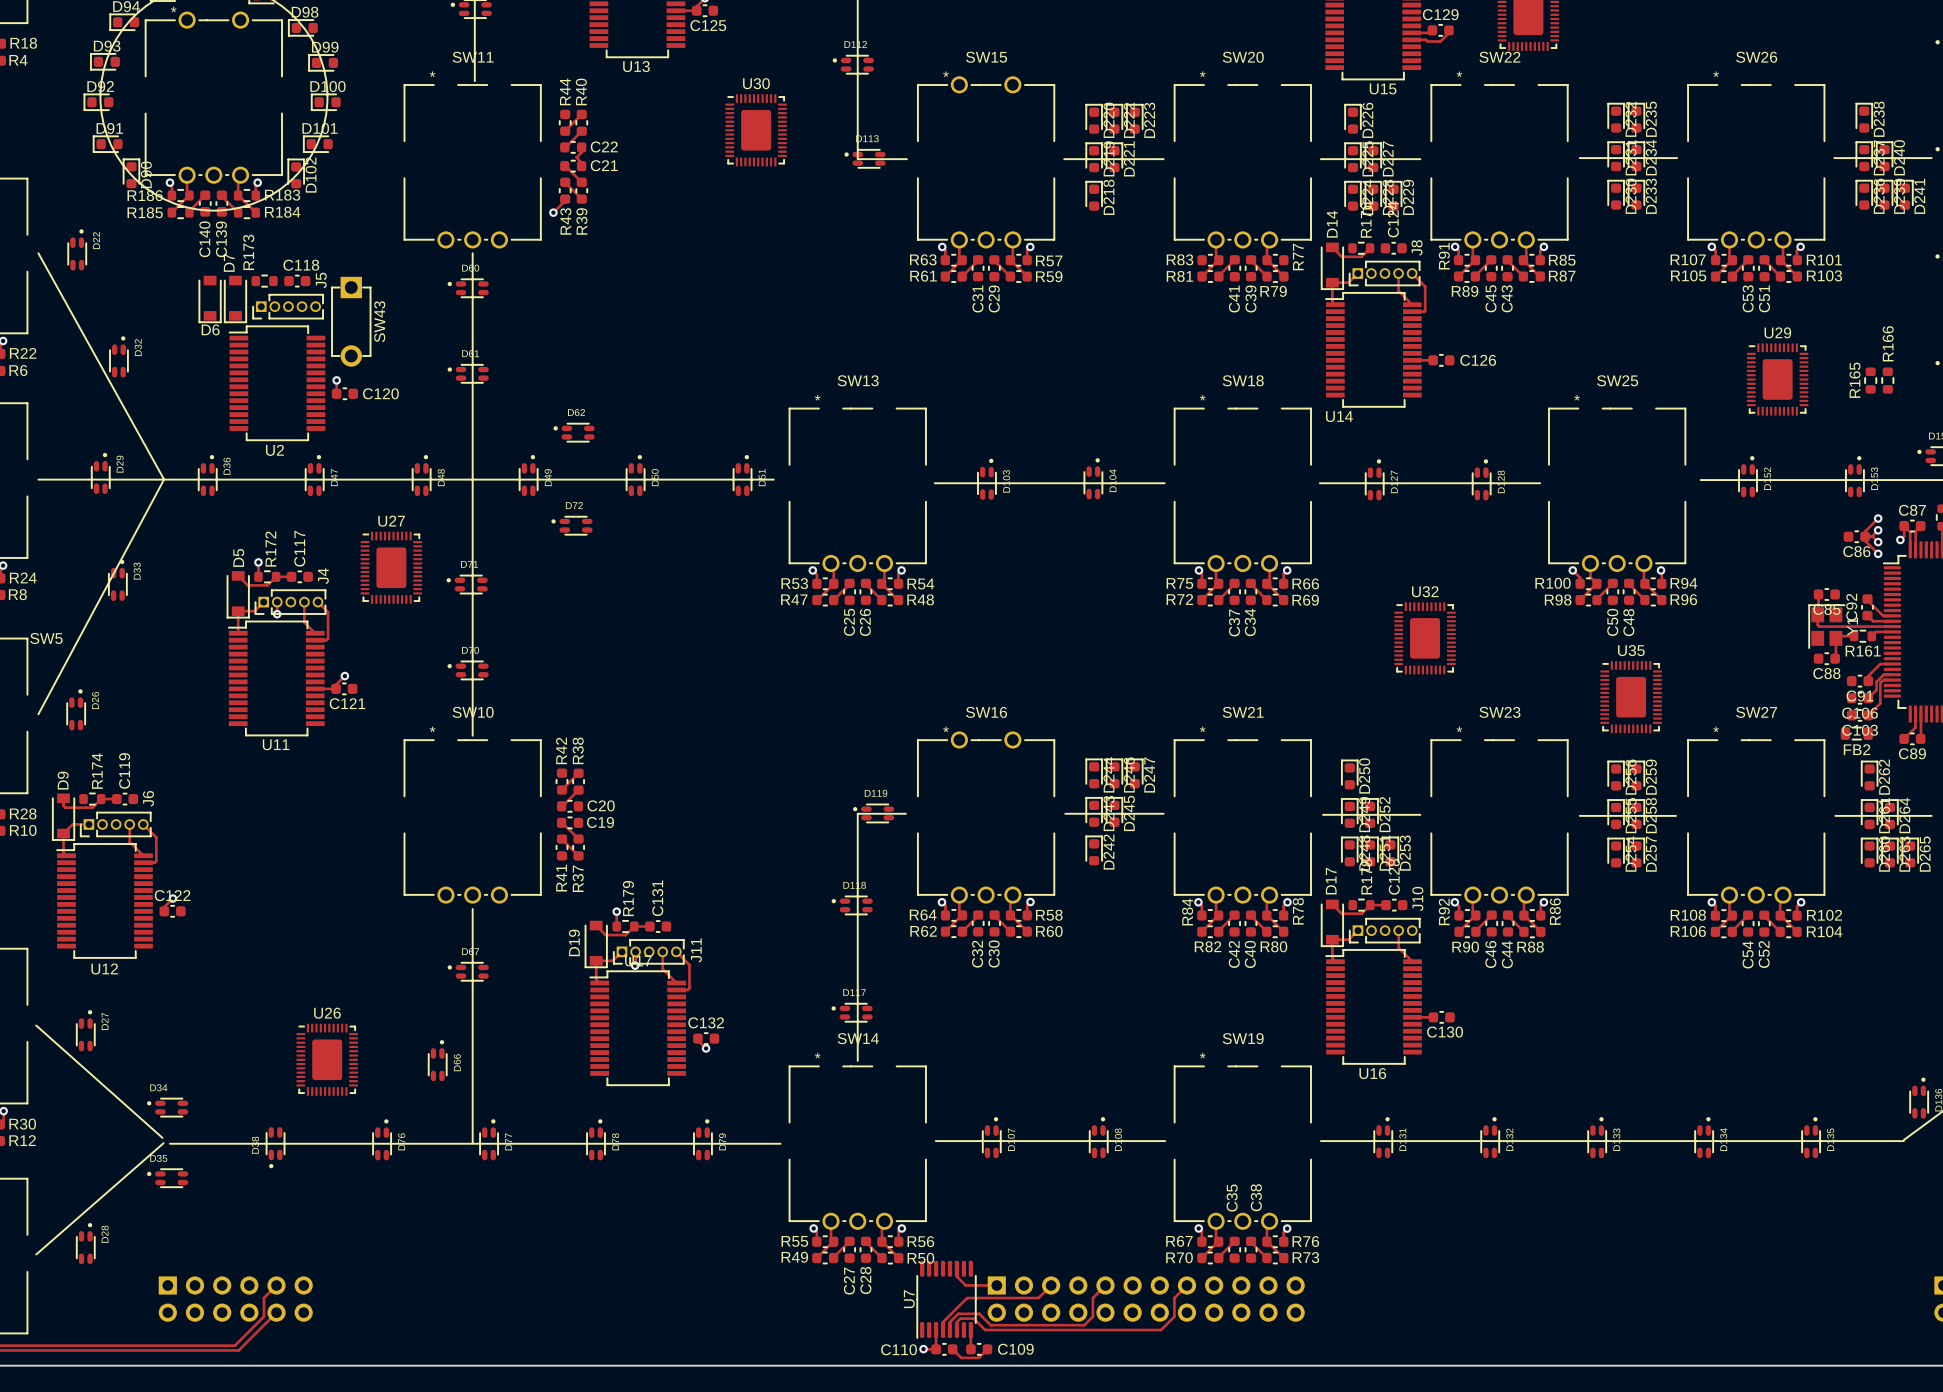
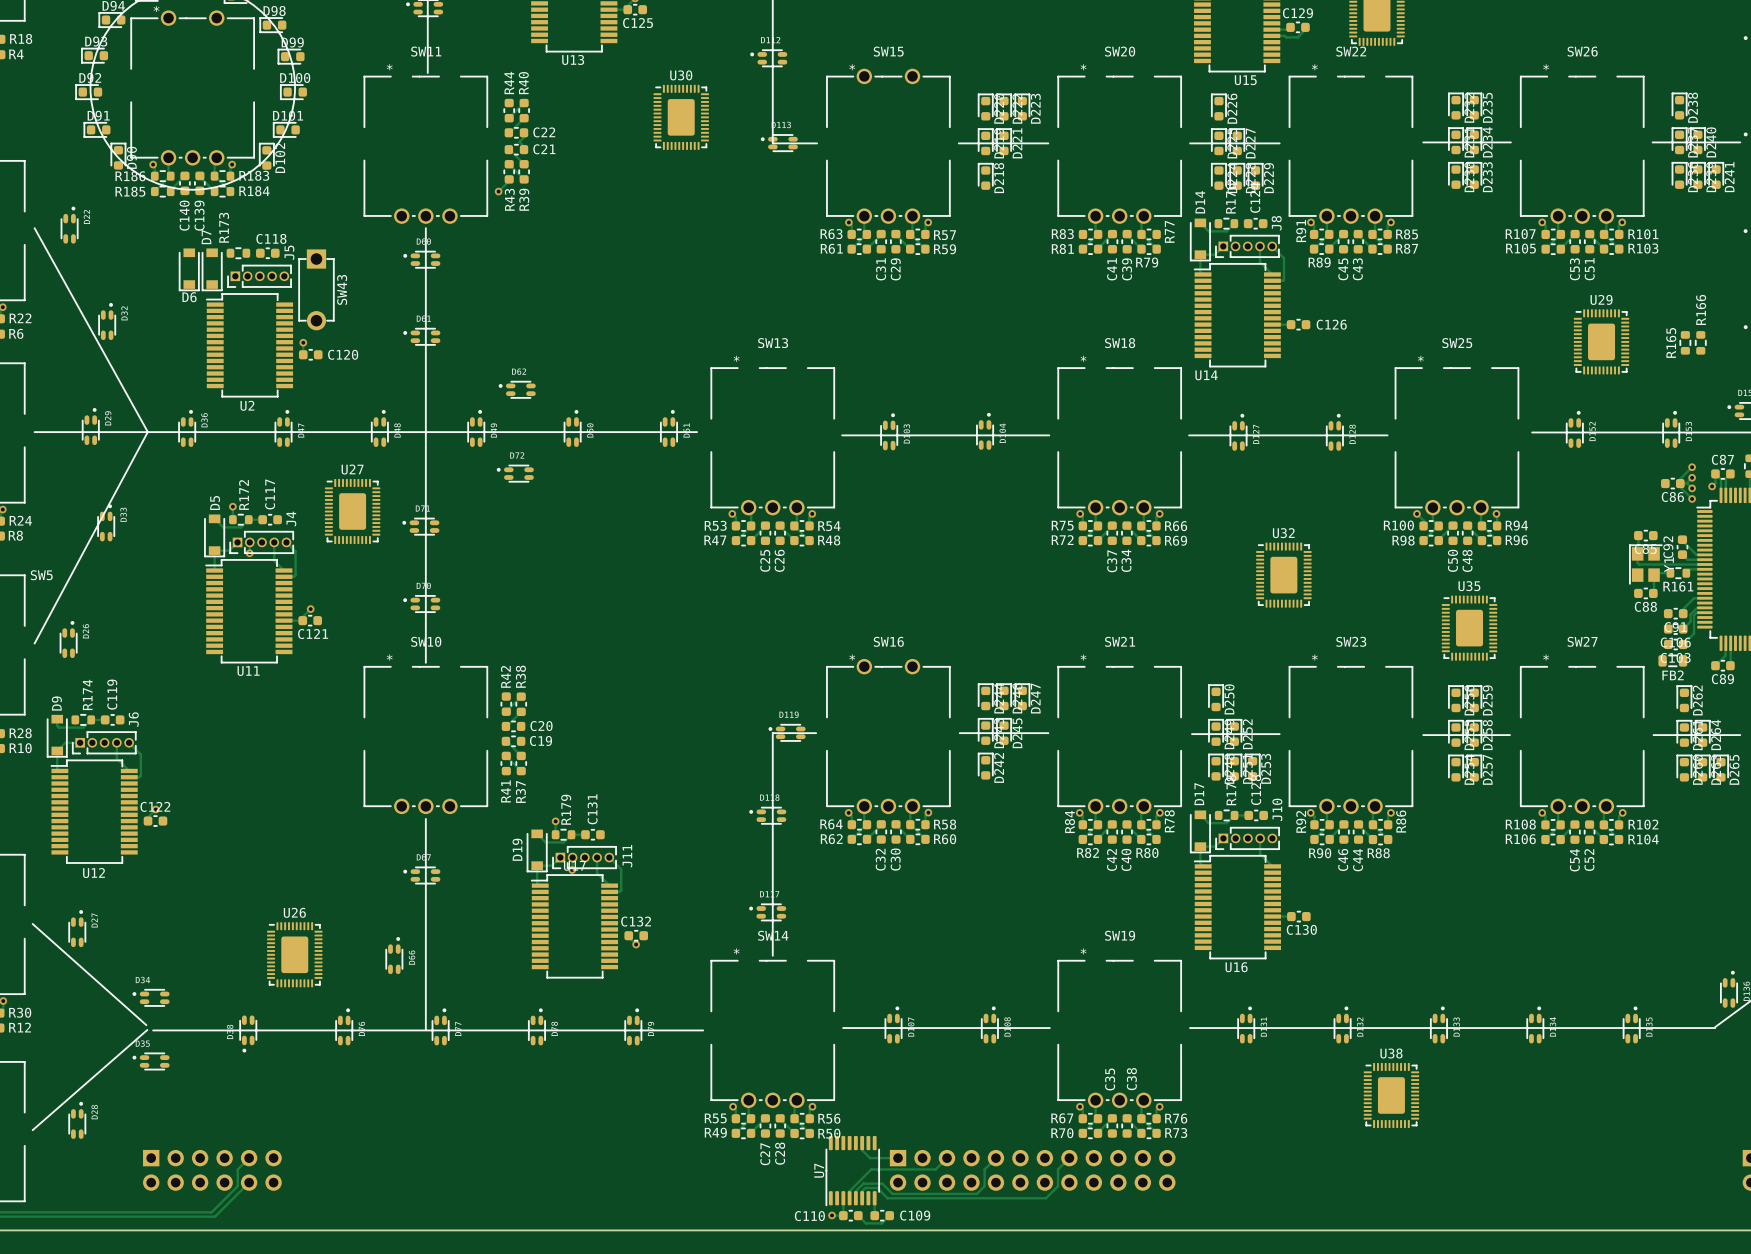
U38: none -> (1391, 1095)

